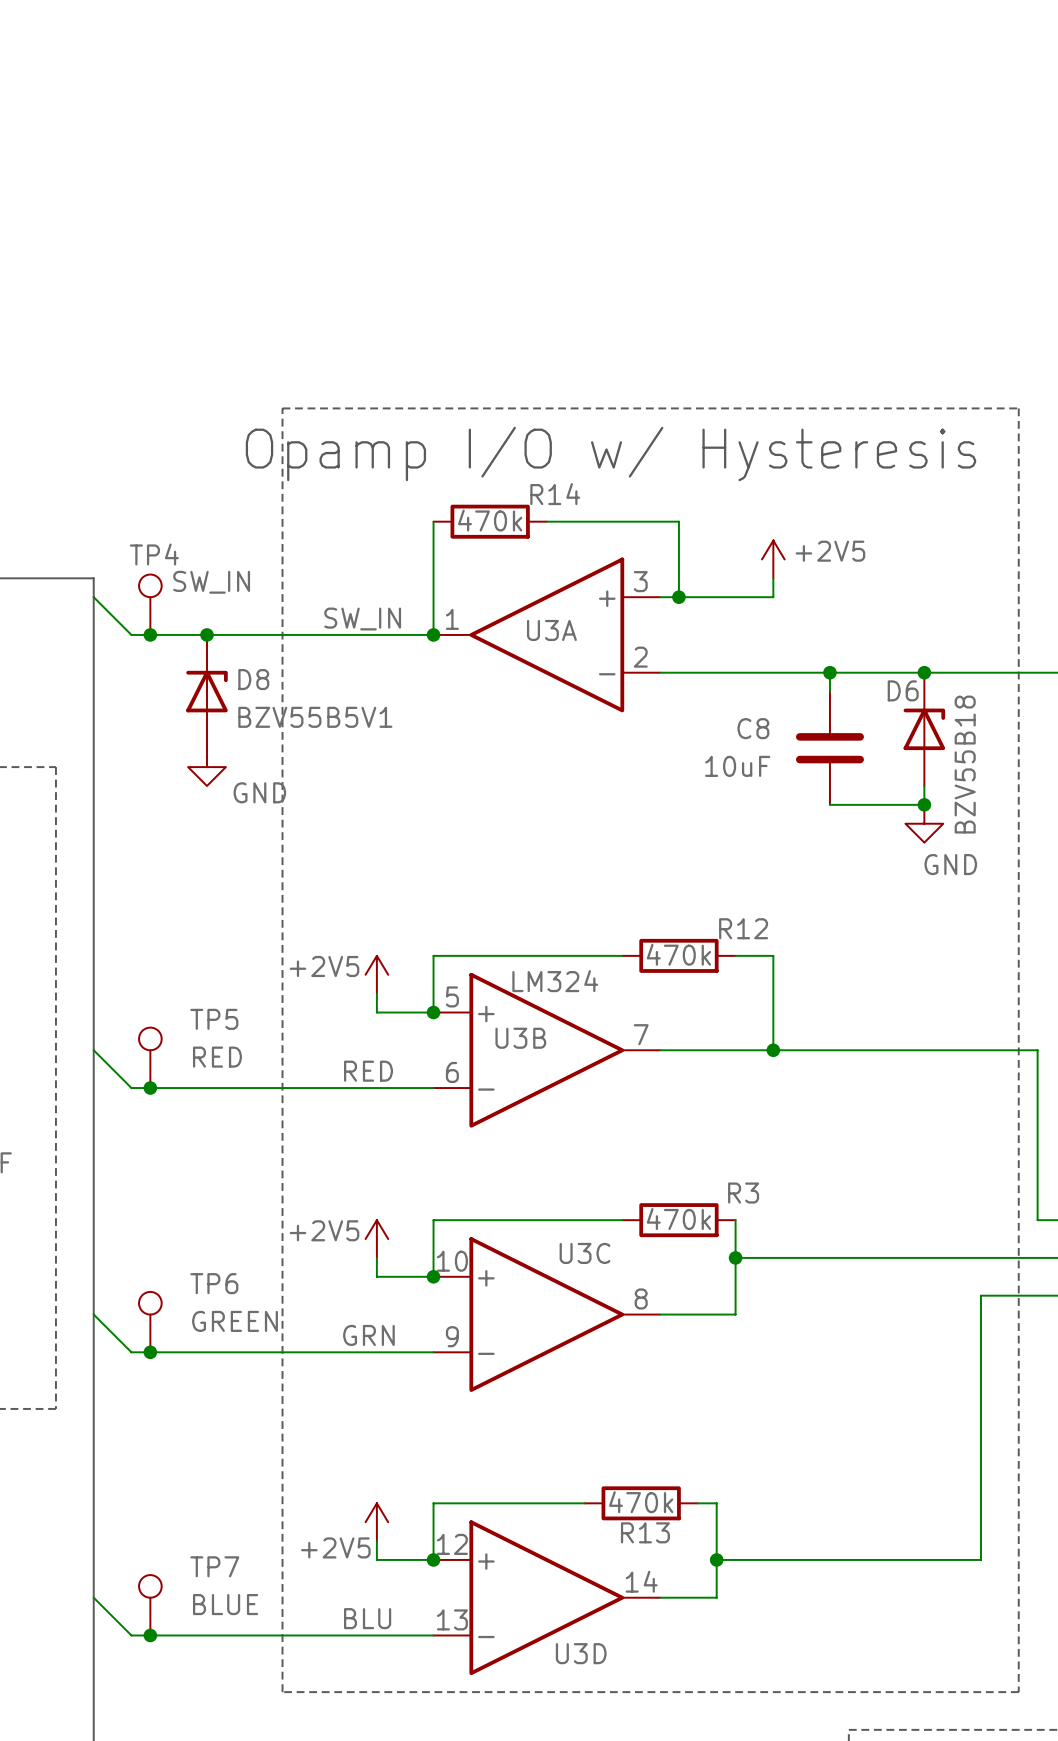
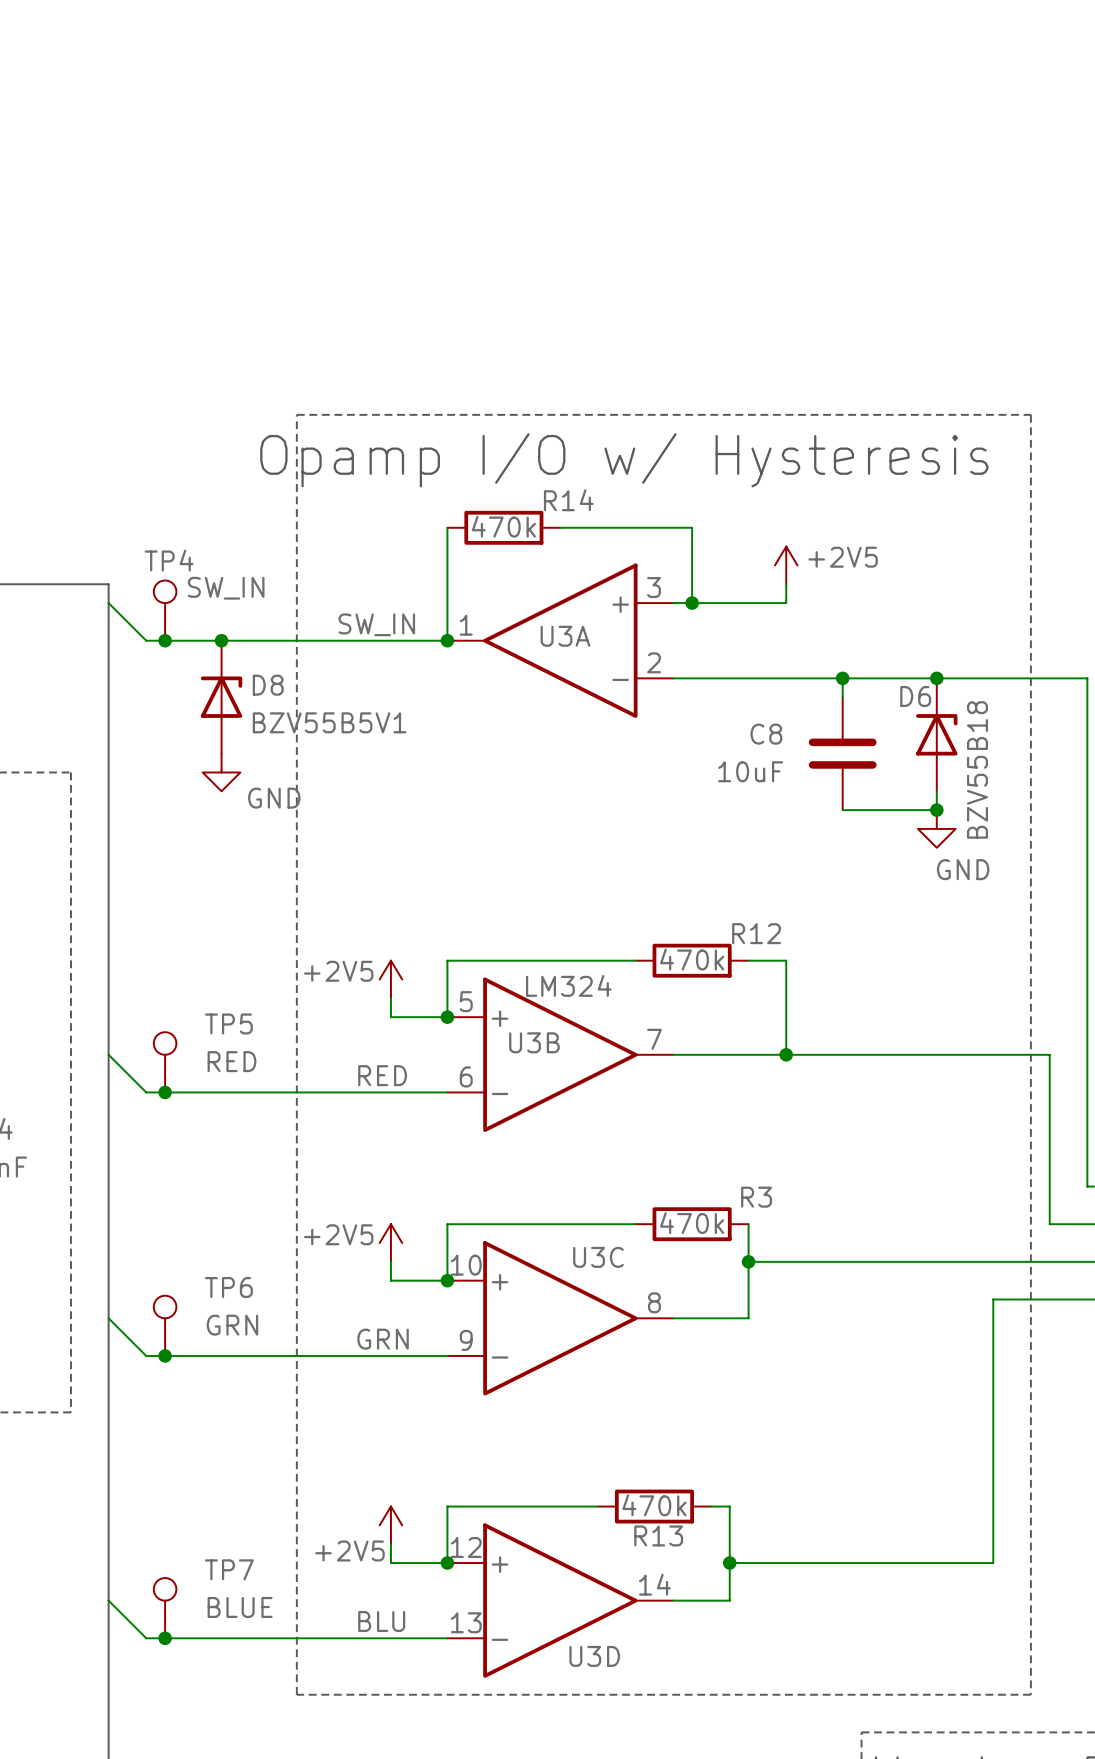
TP6 value: GREEN (235, 1321) -> GRN (232, 1325)

